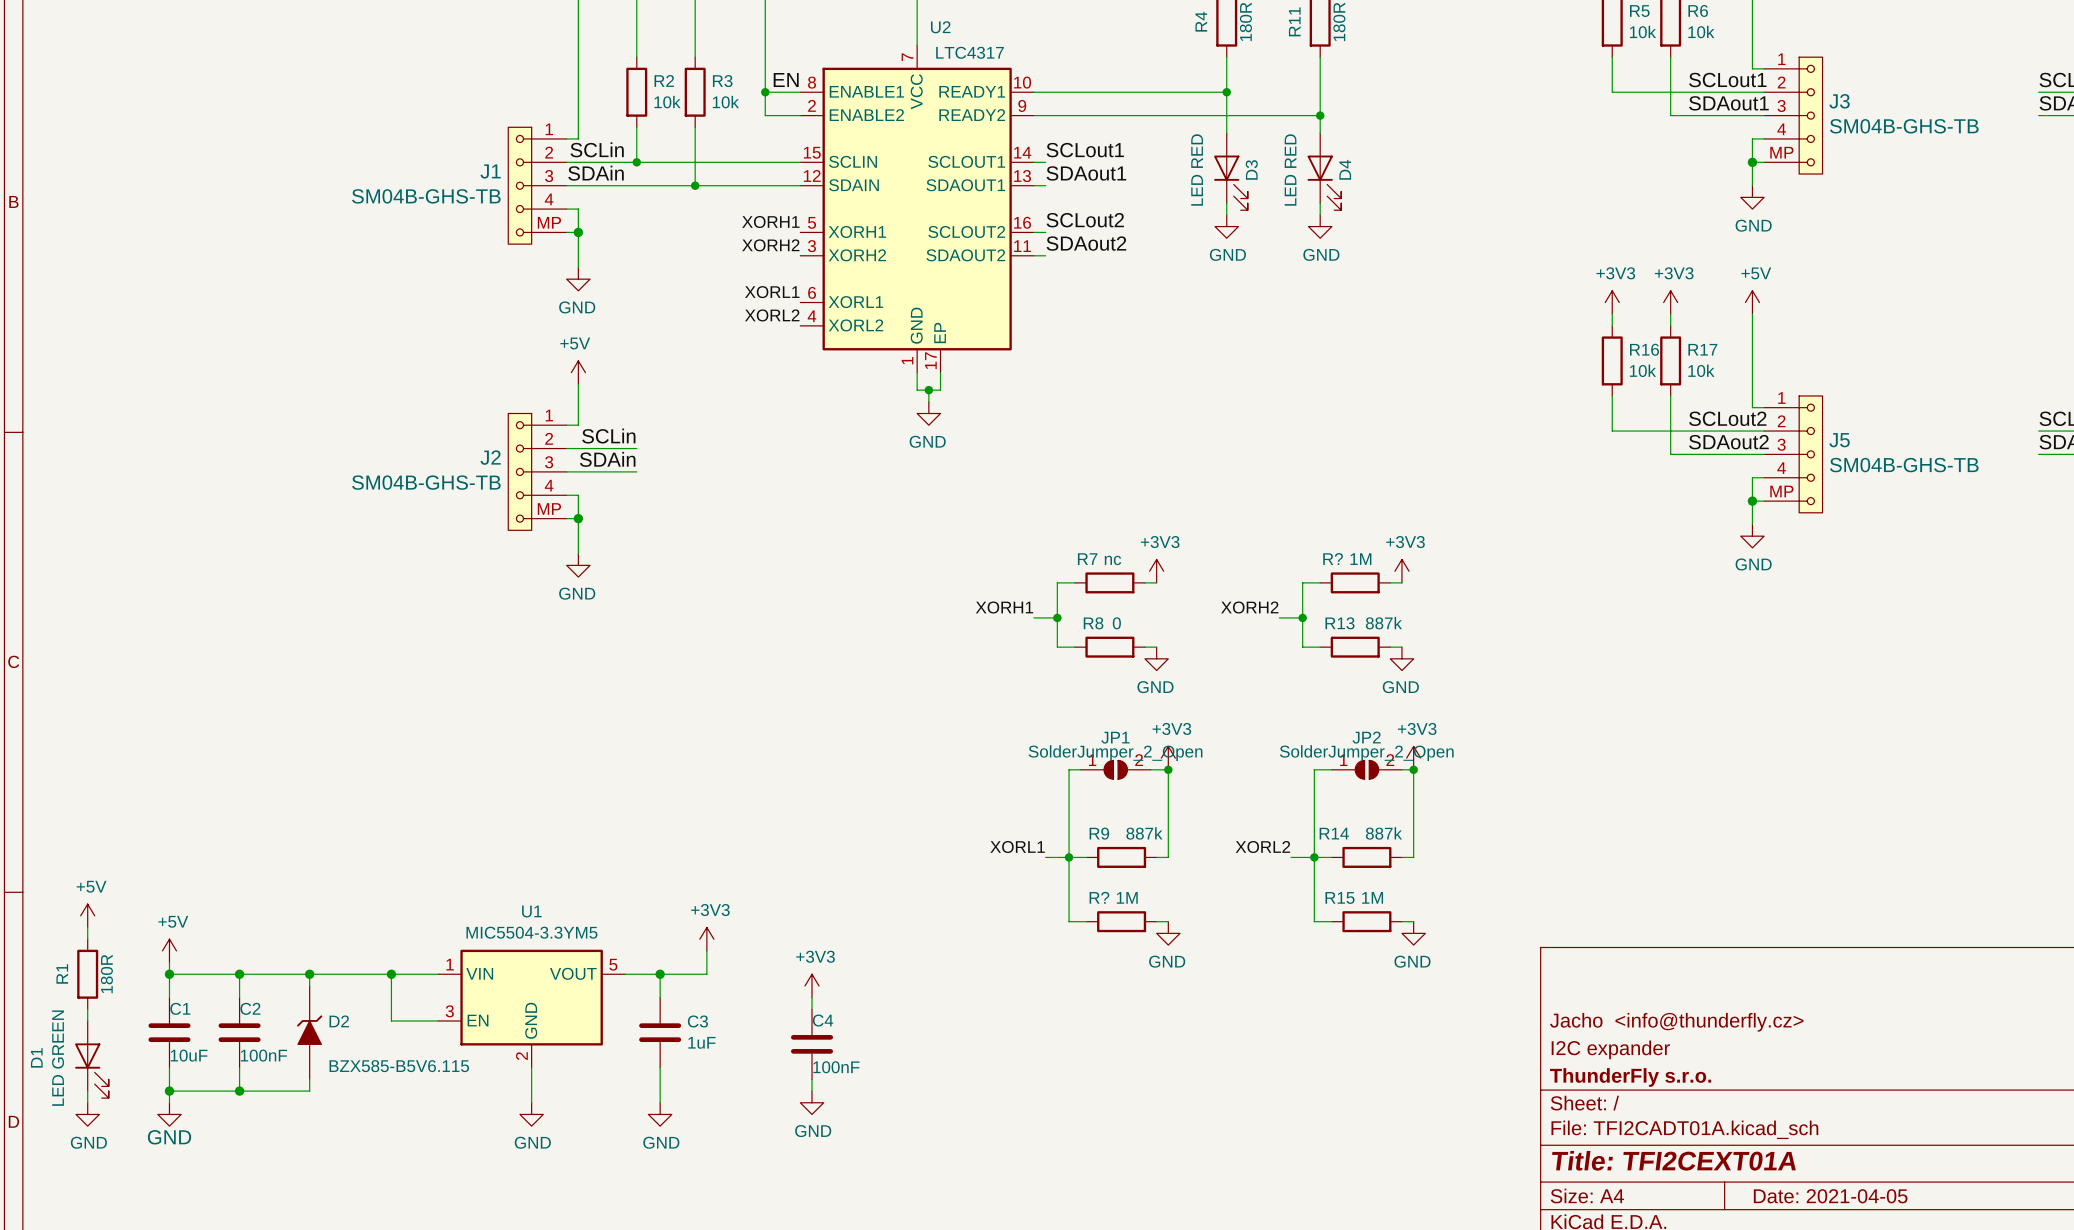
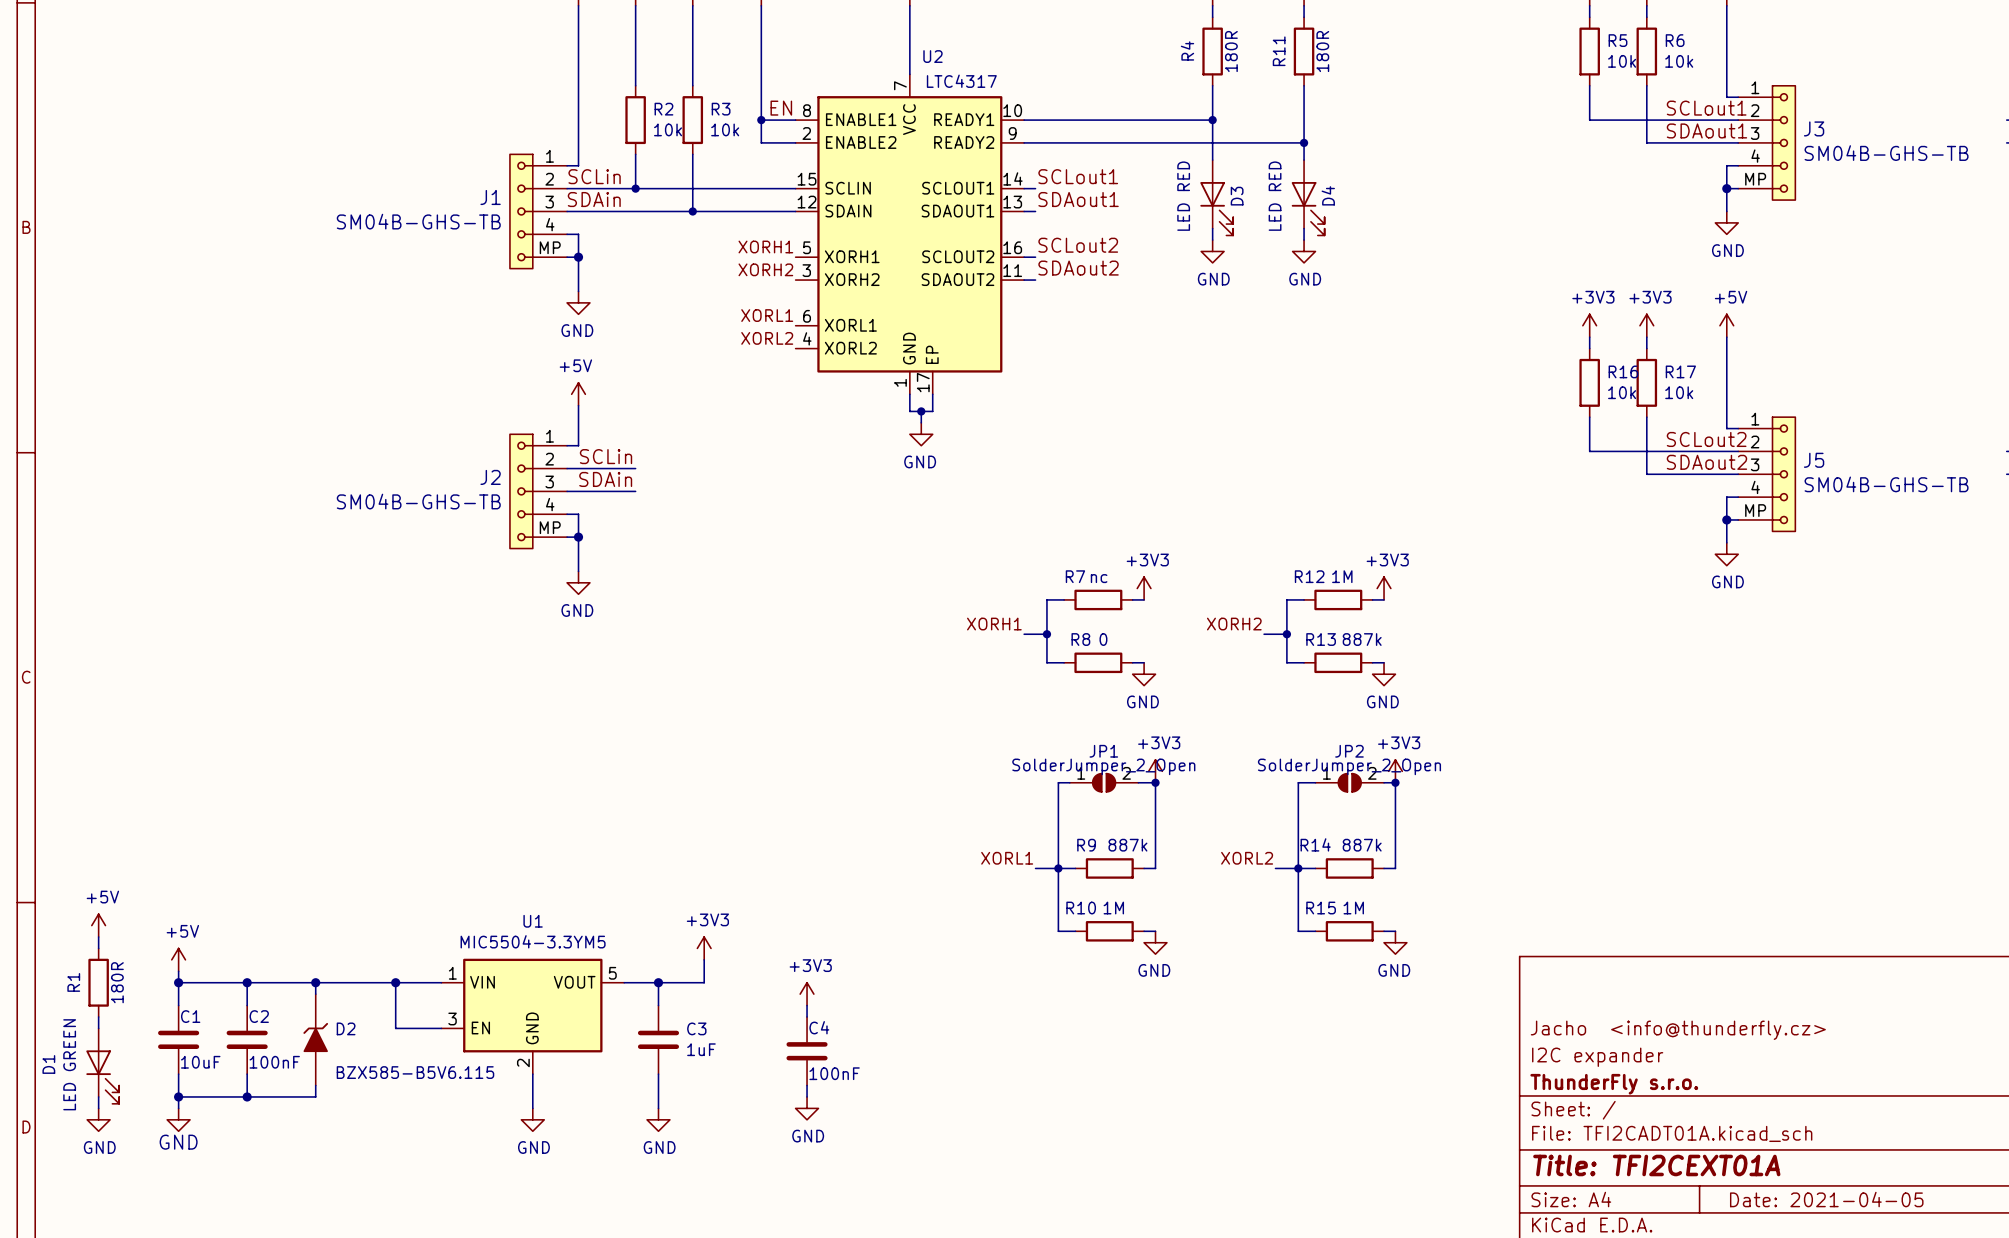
R? name: R? (1333, 559) -> R12 (1309, 576)
R? name: R? (1099, 897) -> R10 (1081, 908)

